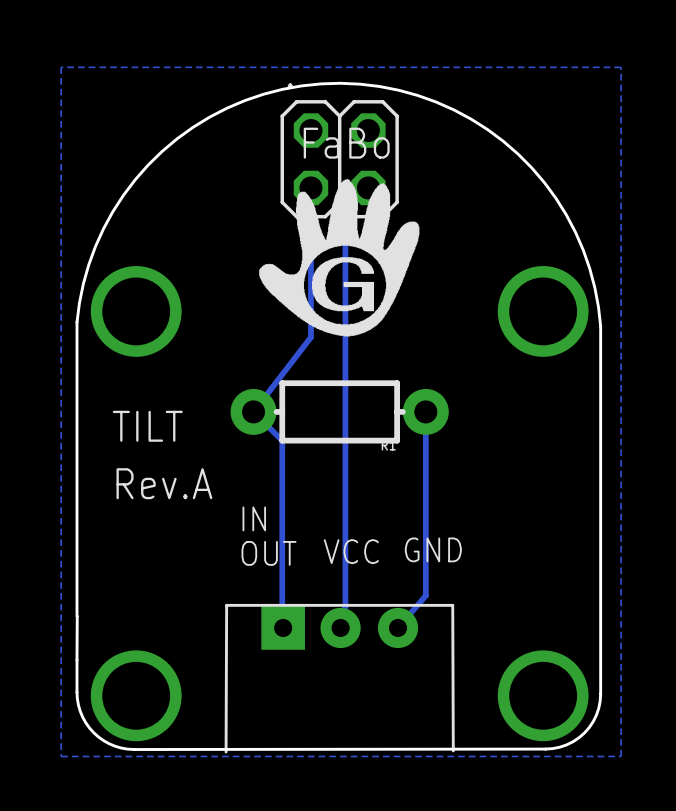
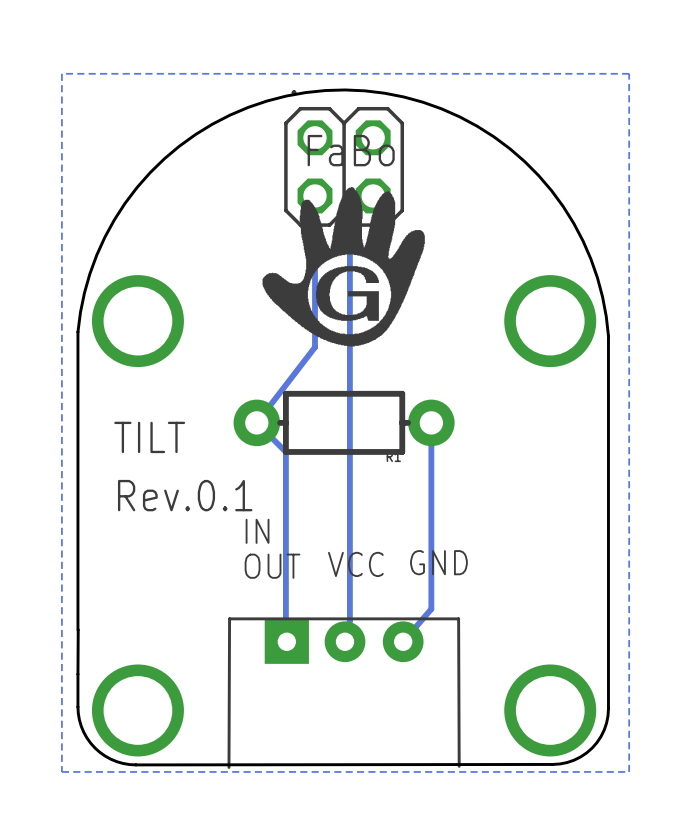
text: Rev.A (164, 483) -> Rev.0.1 (185, 495)

